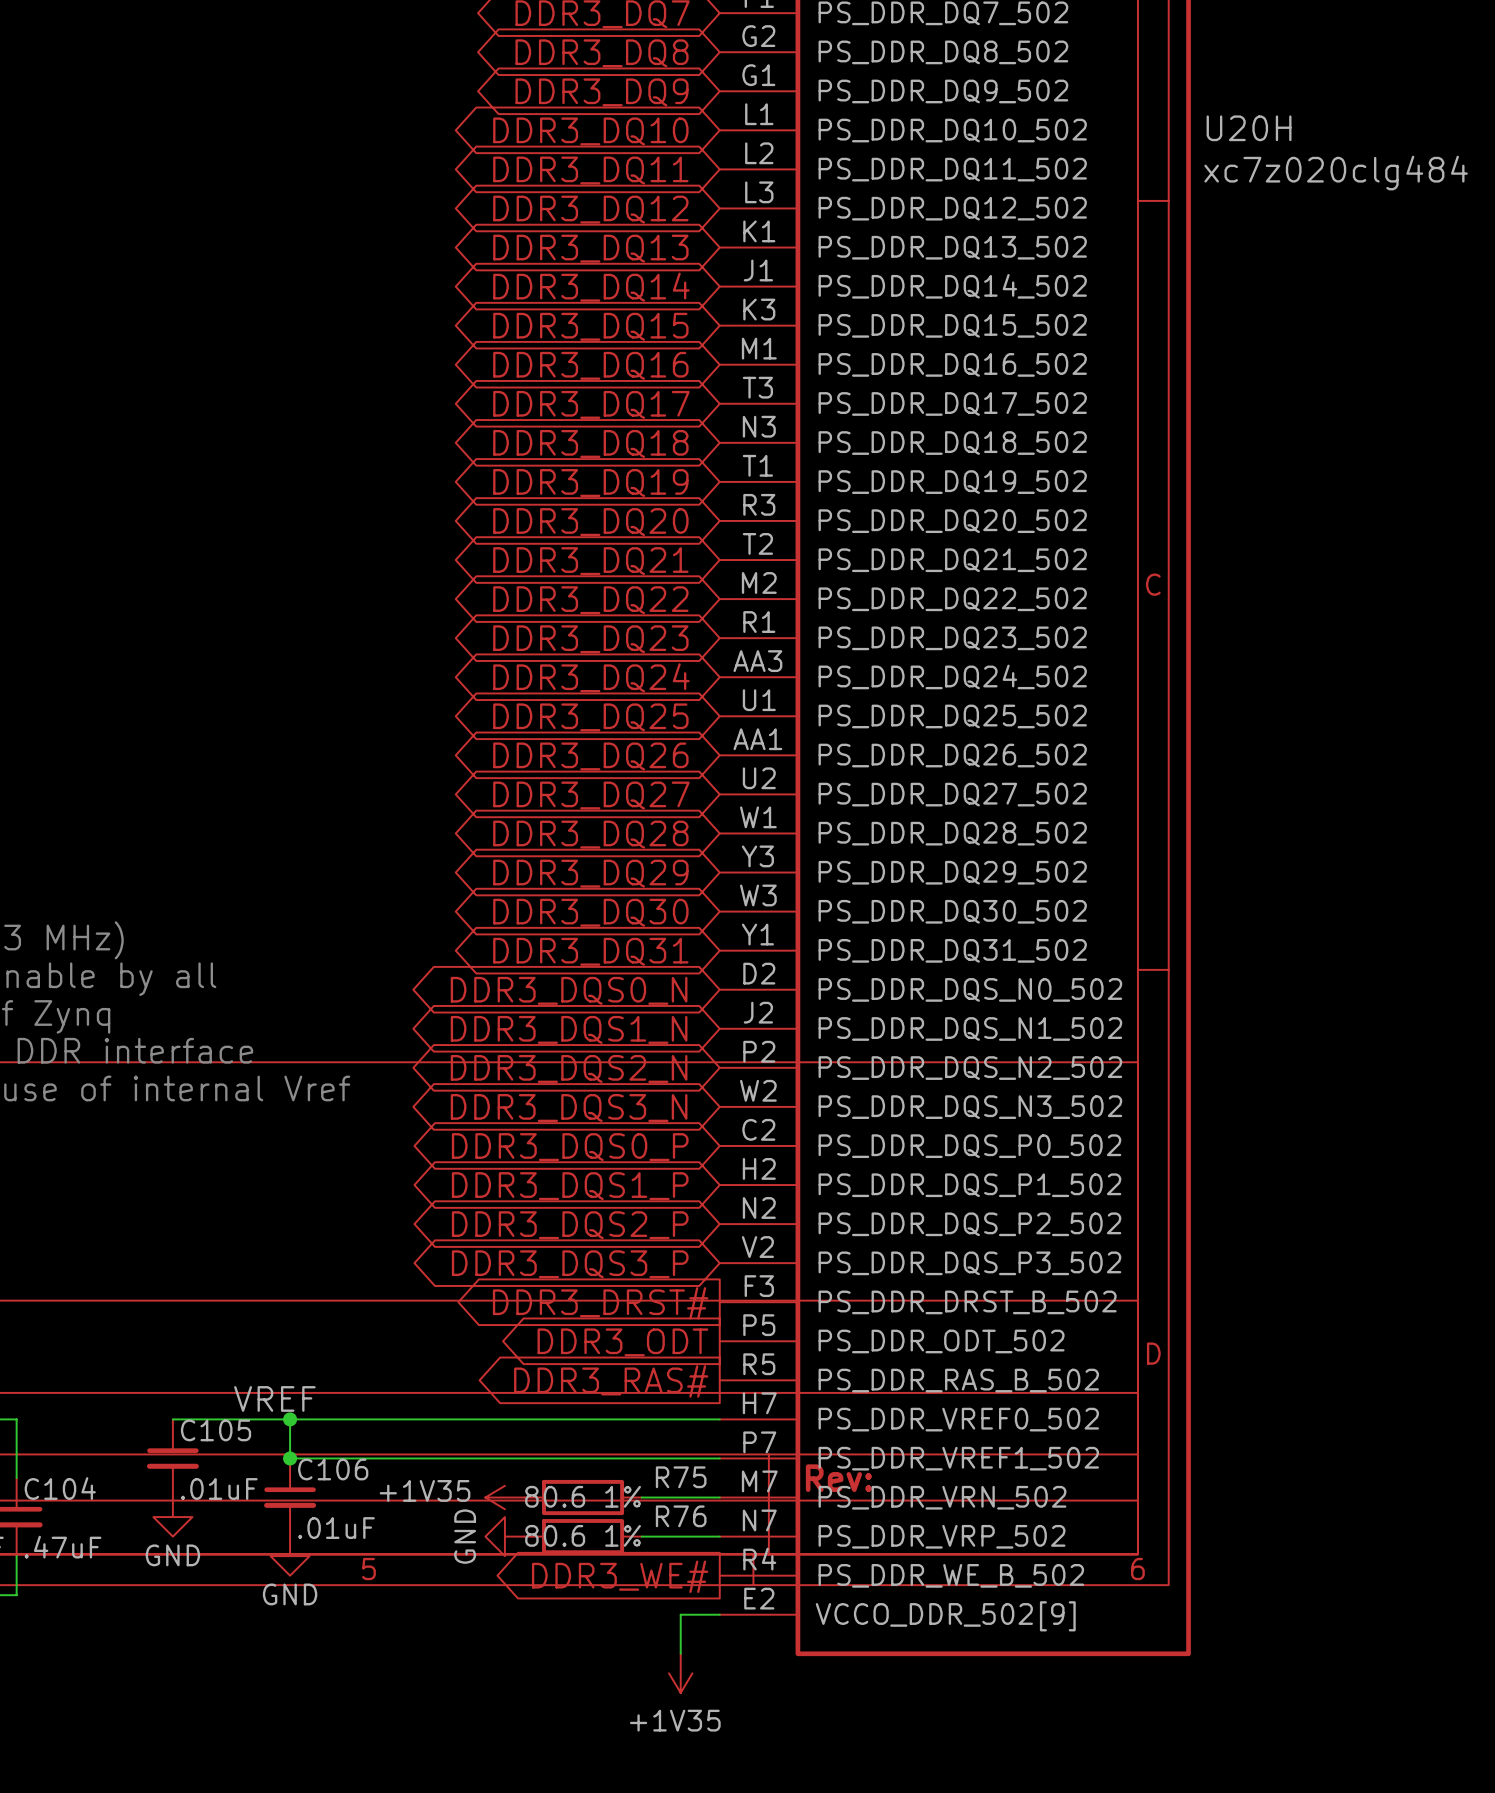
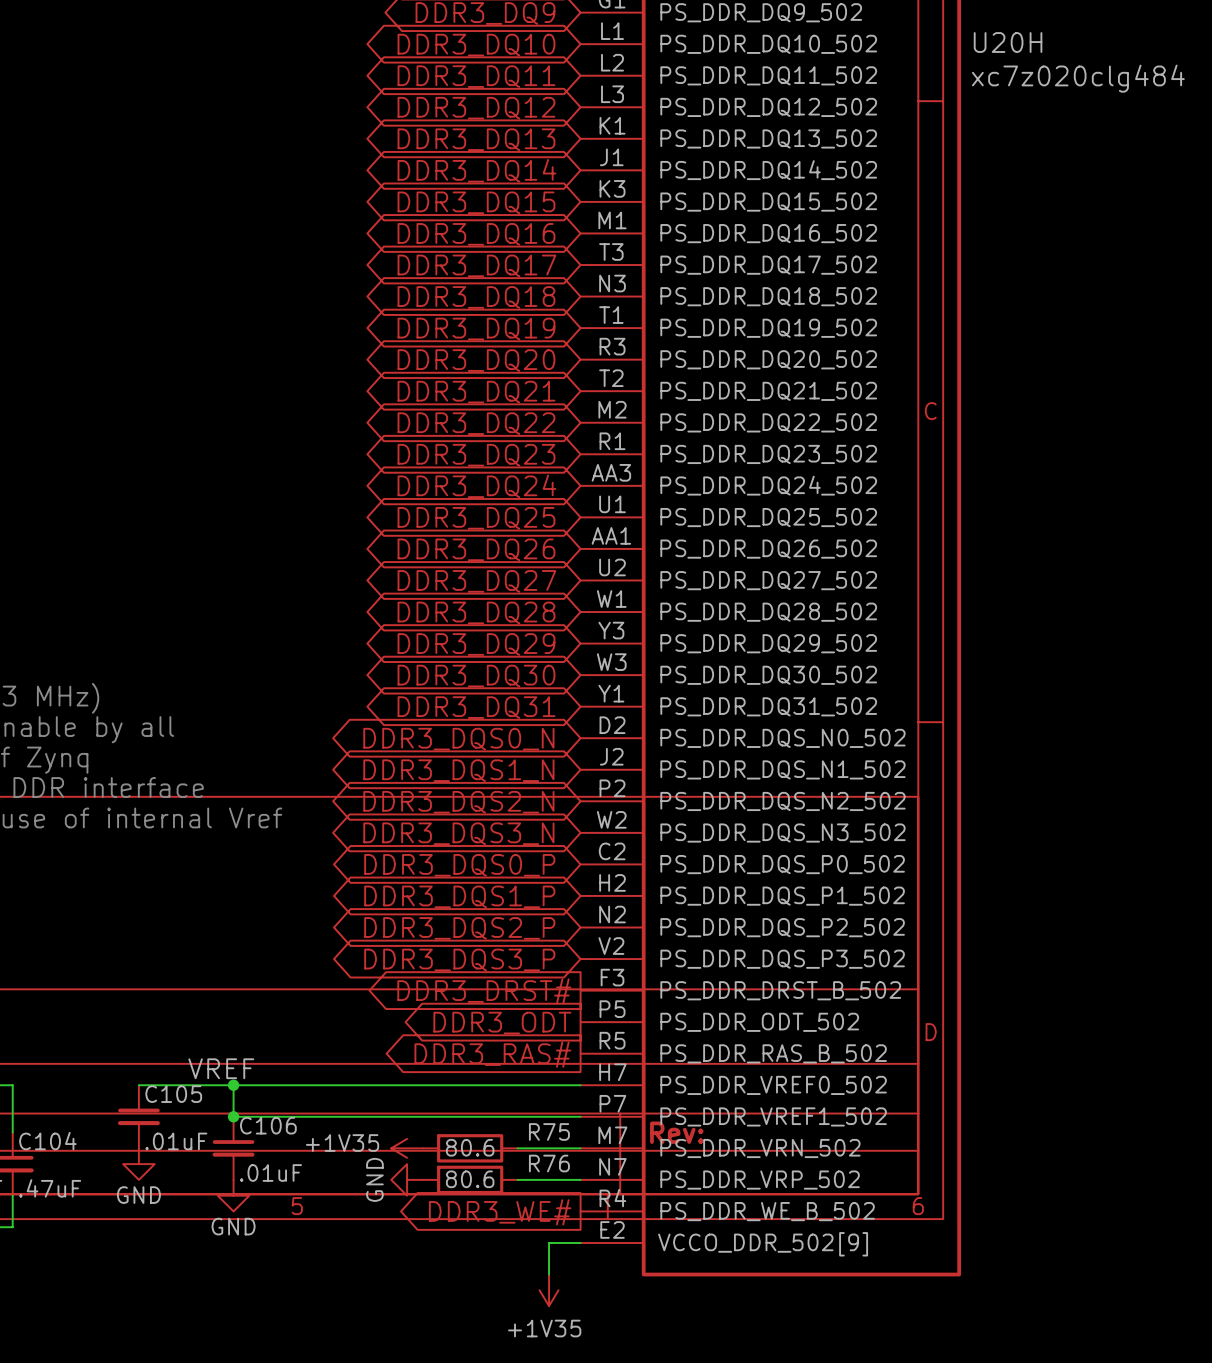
R75 value: 80.6 1% (583, 1496) -> 80.6 (470, 1147)
R76 value: 80.6 1% (583, 1535) -> 80.6 (470, 1179)

